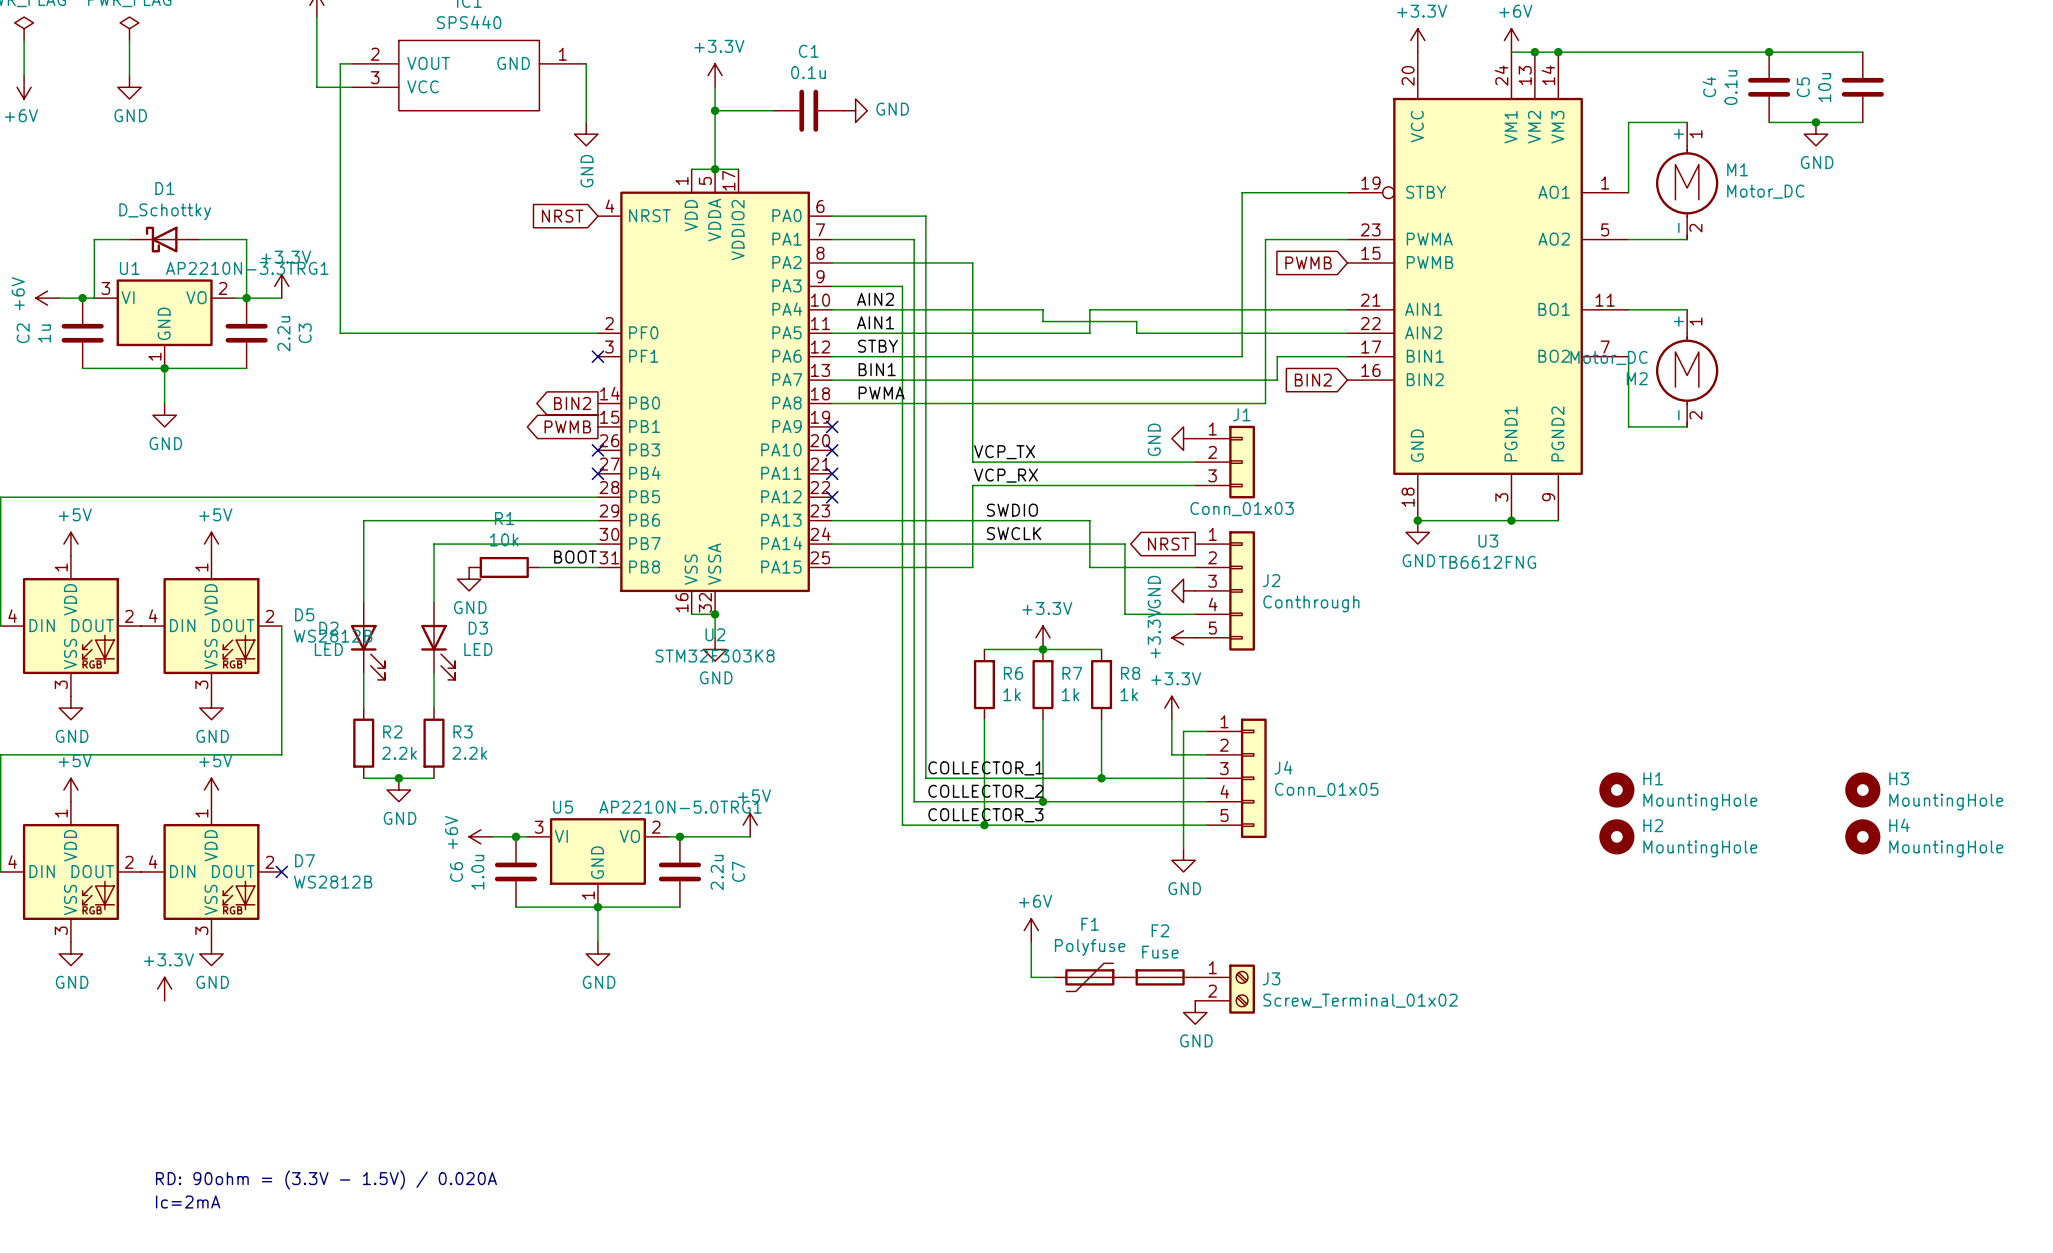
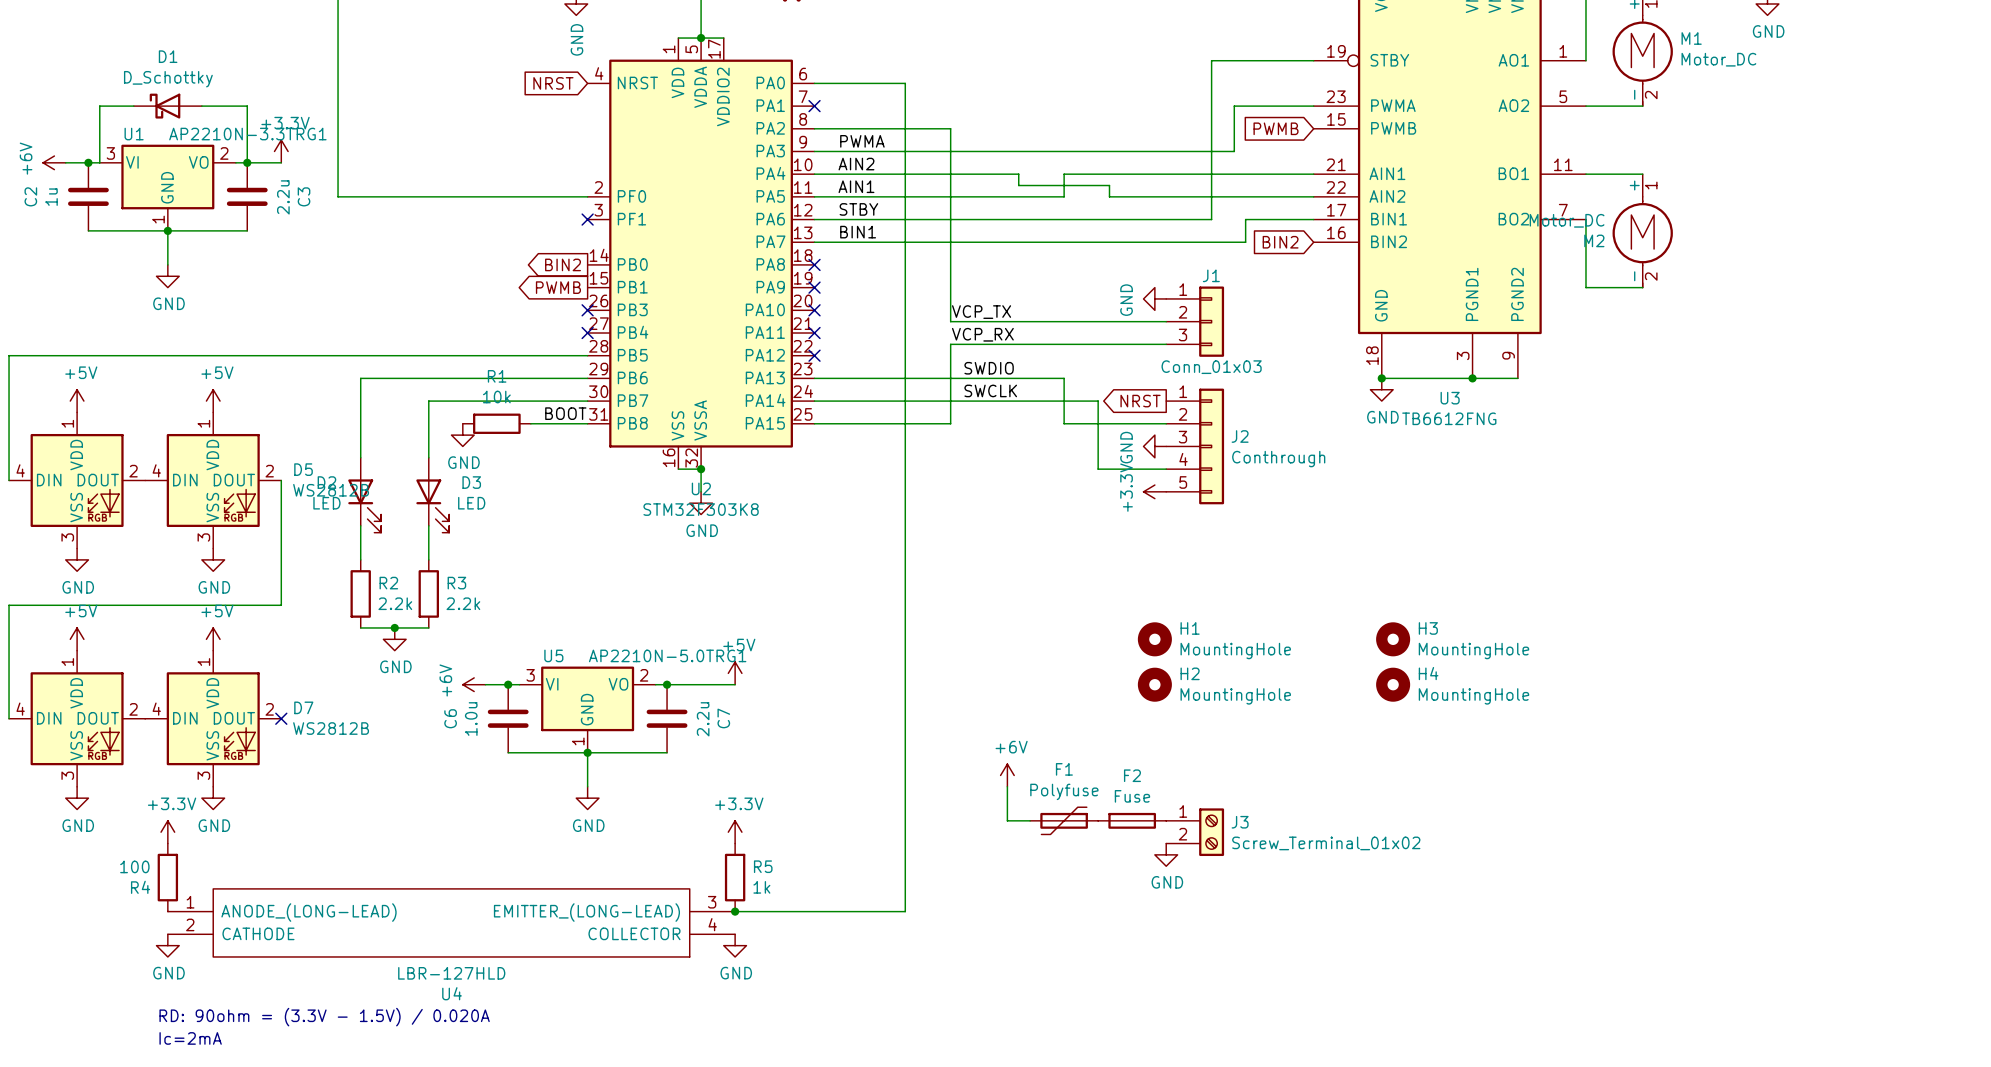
wire: (832, 239) (914, 239) (914, 801) (1206, 801) -> none
no-connect mark: none -> (814, 106)
wire: (902, 286) (902, 825) (1206, 825) -> none
wire: (1265, 286) (1265, 403) (832, 403) -> (1234, 151) (882, 151)
label position: PWMA (881, 393) -> PWMA (862, 141)
no-connect mark: none -> (814, 264)
power symbol: +3.3V (1043, 637) -> none
wire: (984, 649) (1101, 649) -> none
junction: (1043, 649) -> none
R6: 1k (984, 684) -> none
R7: 1k (1043, 684) -> none
R8: 1k (1101, 684) -> none
power symbol: +3.3V (1171, 708) -> none
wire: (984, 719) (984, 825) -> none
wire: (1043, 719) (1043, 801) -> none
wire: (1101, 719) (1101, 778) -> none
wire: (1171, 719) (1171, 754) (1206, 754) -> none
wire: (1206, 731) (1183, 731) (1183, 848) -> none
label: COLLECTOR_1 (985, 768) -> none
wire: (925, 778) (1206, 778) -> (905, 627) (905, 911) (735, 911)
junction: (1101, 778) -> none
J4: Conn_01x05 (1236, 778) -> none
H1 position: (1616, 790) -> (1154, 639)
H3 position: (1862, 790) -> (1393, 639)
label: COLLECTOR_2 (985, 791) -> none
junction: (1043, 801) -> none
label: COLLECTOR_3 (985, 815) -> none
junction: (984, 825) -> none
H2 position: (1616, 836) -> (1154, 684)
H4 position: (1862, 836) -> (1393, 684)
power symbol: GND (1183, 860) -> none
power symbol: none -> +3.3V (735, 832)
R4: none -> 100 (167, 877)
R5: none -> 1k (735, 877)
junction: none -> (735, 911)
U4: none -> LBR-127HLD (451, 922)
power symbol: none -> GND (167, 945)
power symbol: none -> GND (735, 945)

